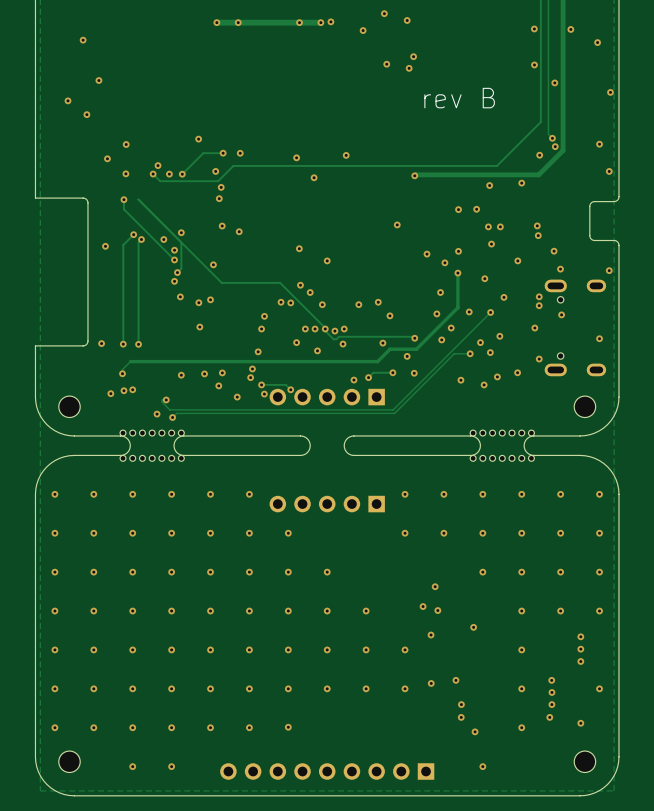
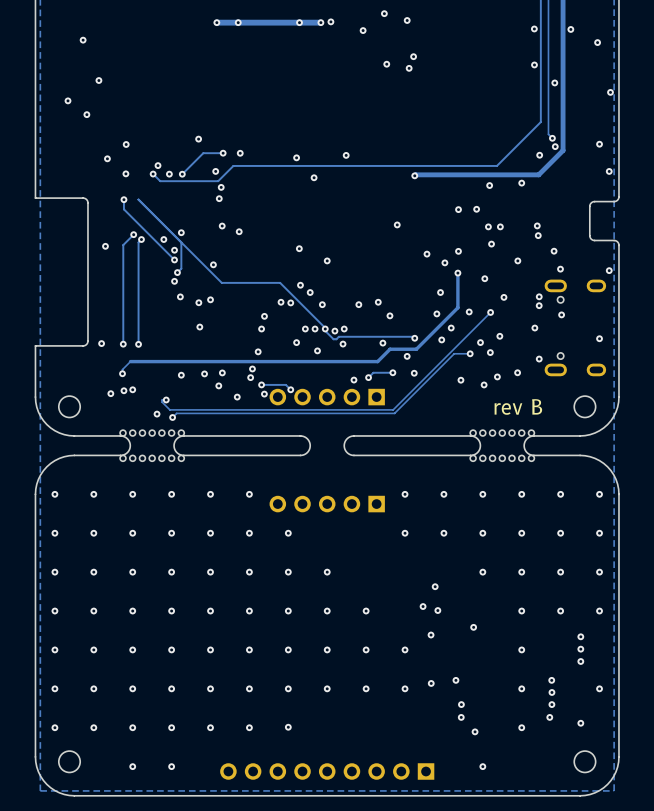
text: rev B (459, 98) -> none
text: none -> rev B (518, 406)

